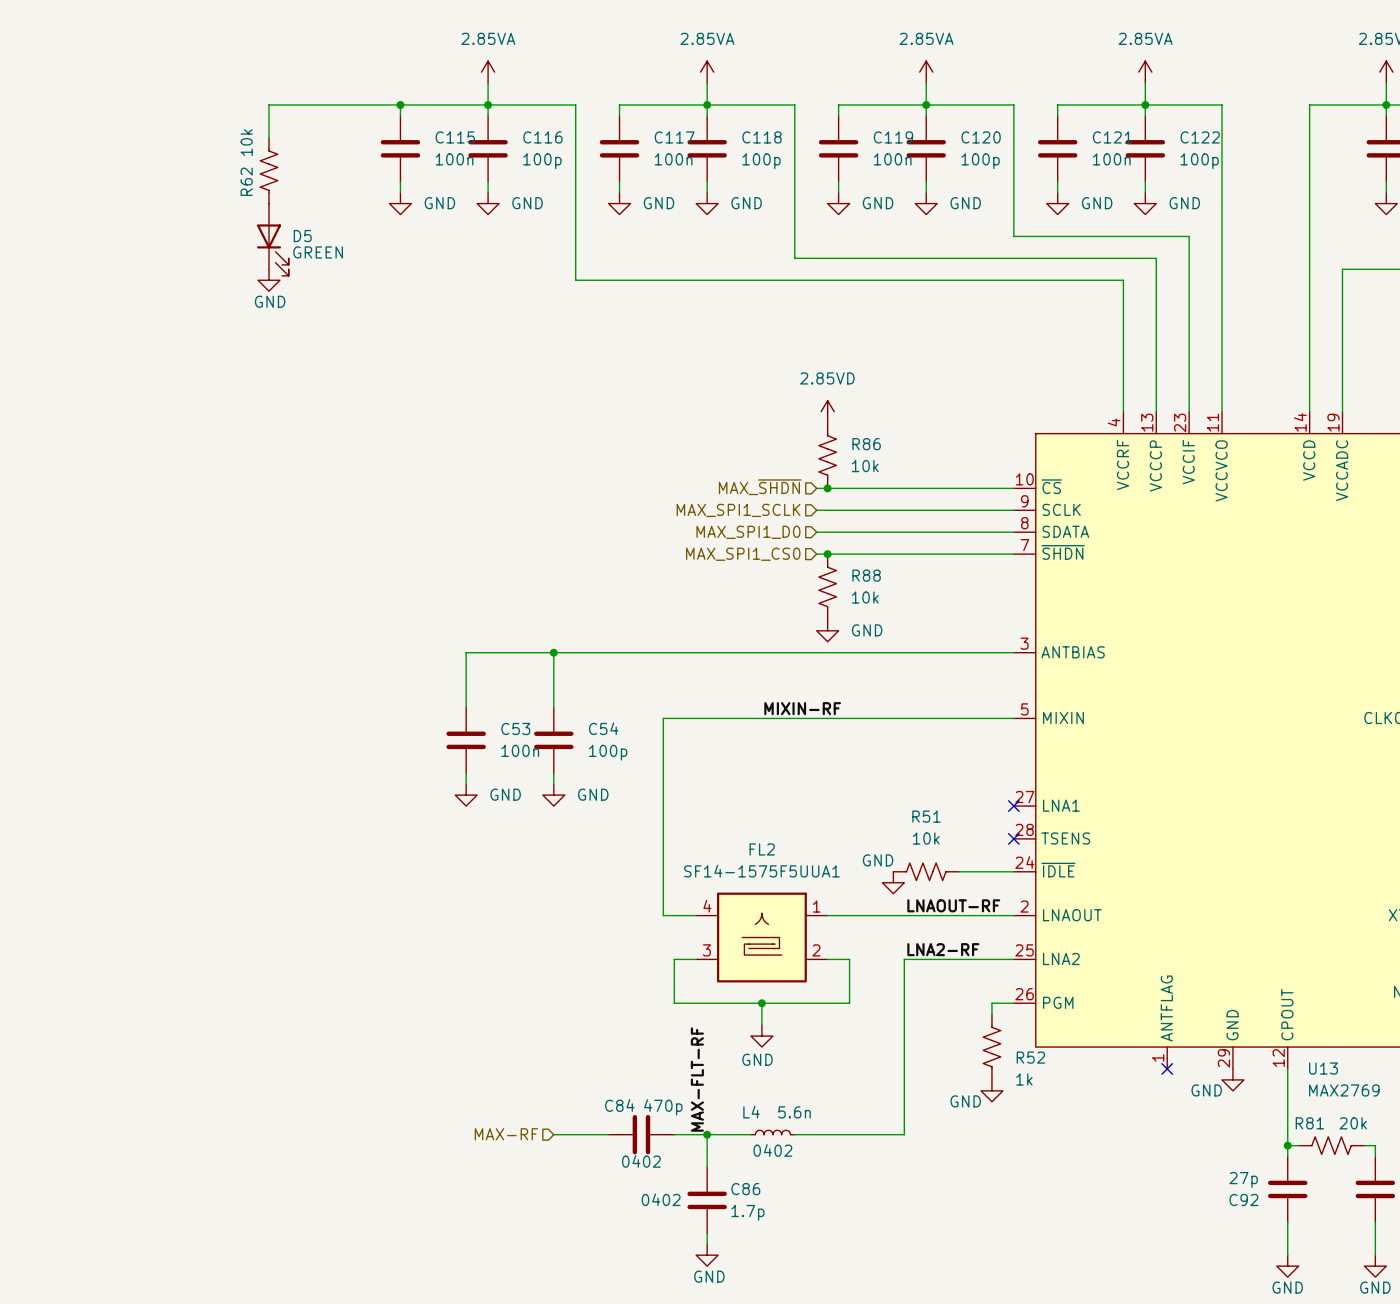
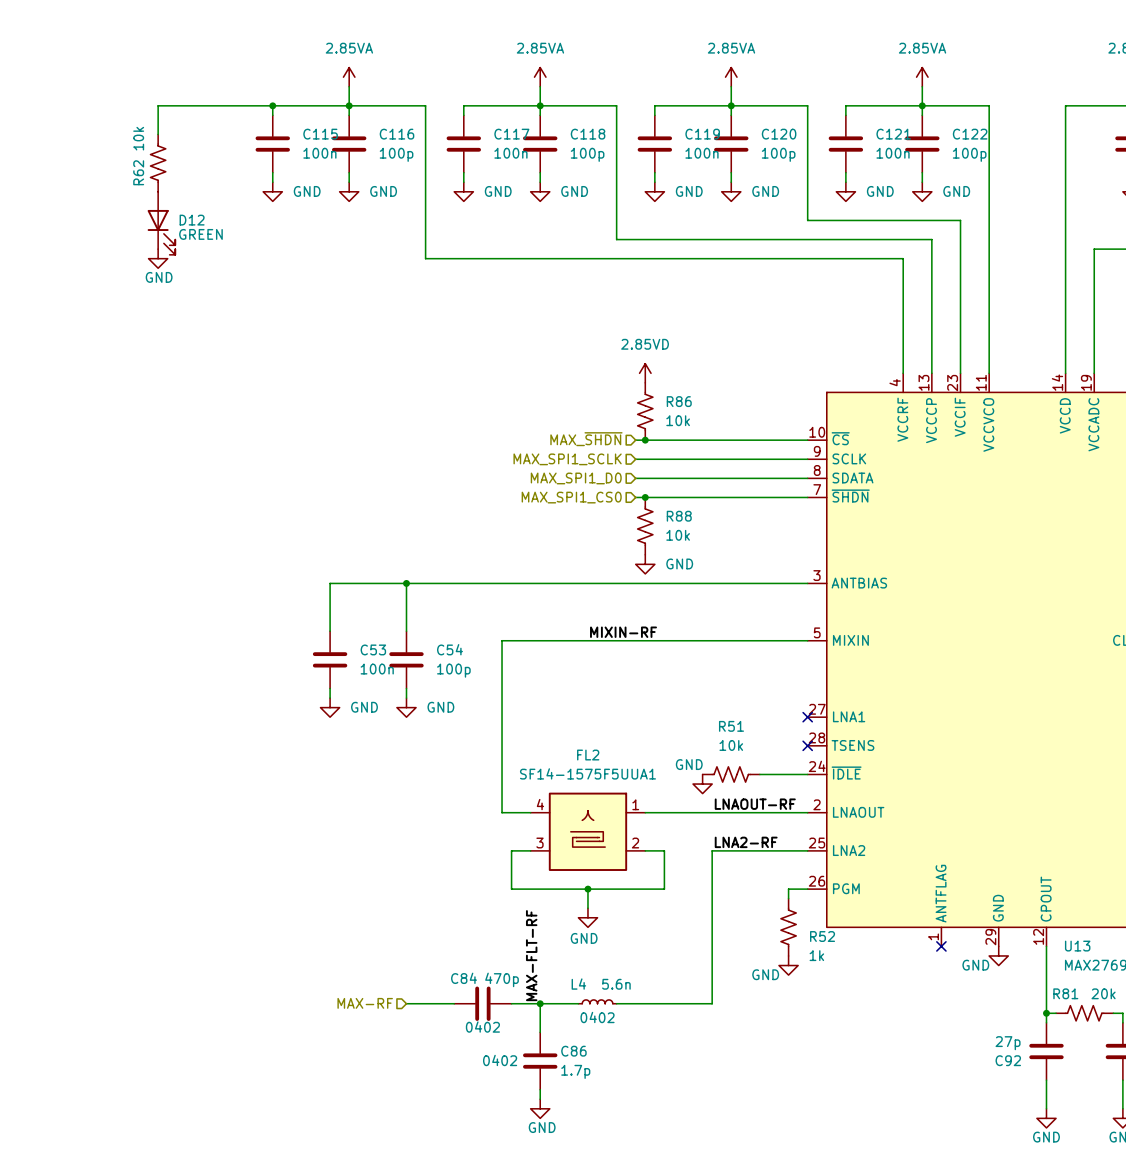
D5 name: D5 (302, 236) -> D12 (192, 220)

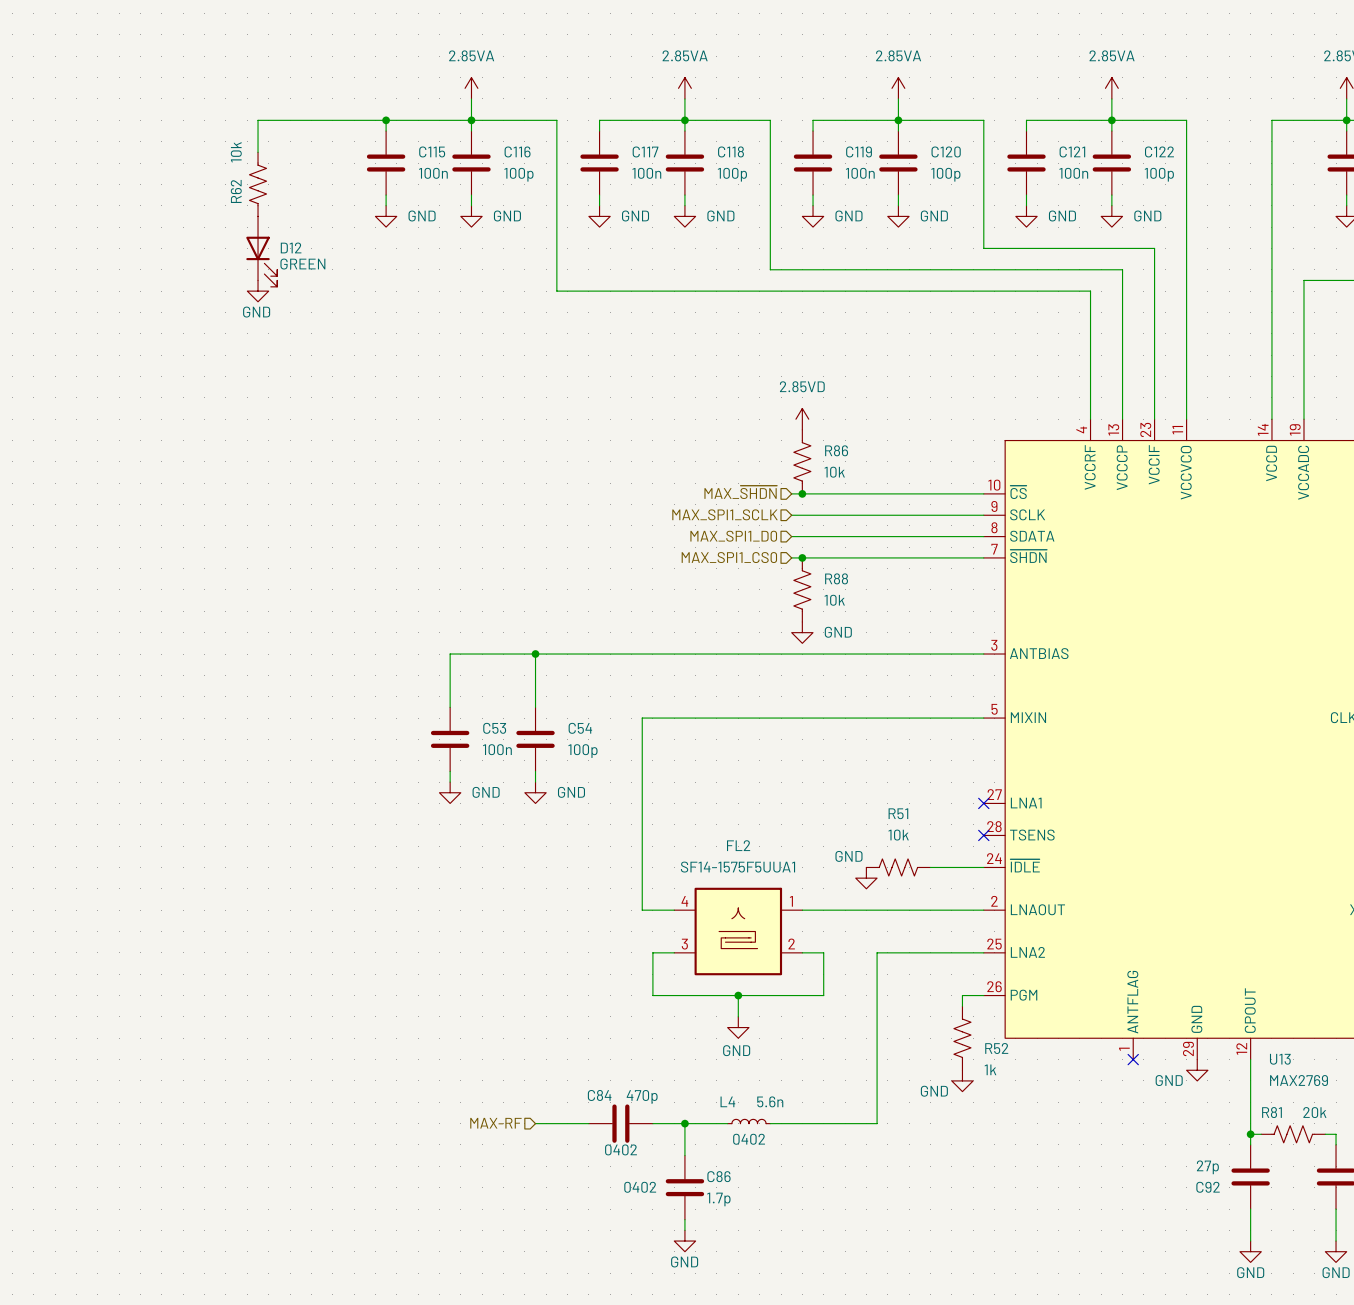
label: MIXIN-RF (623, 632) -> none
label: LNAOUT-RF (755, 804) -> none
label: LNA2-RF (746, 842) -> none
label: MAX-FLT-RF (531, 955) -> none

